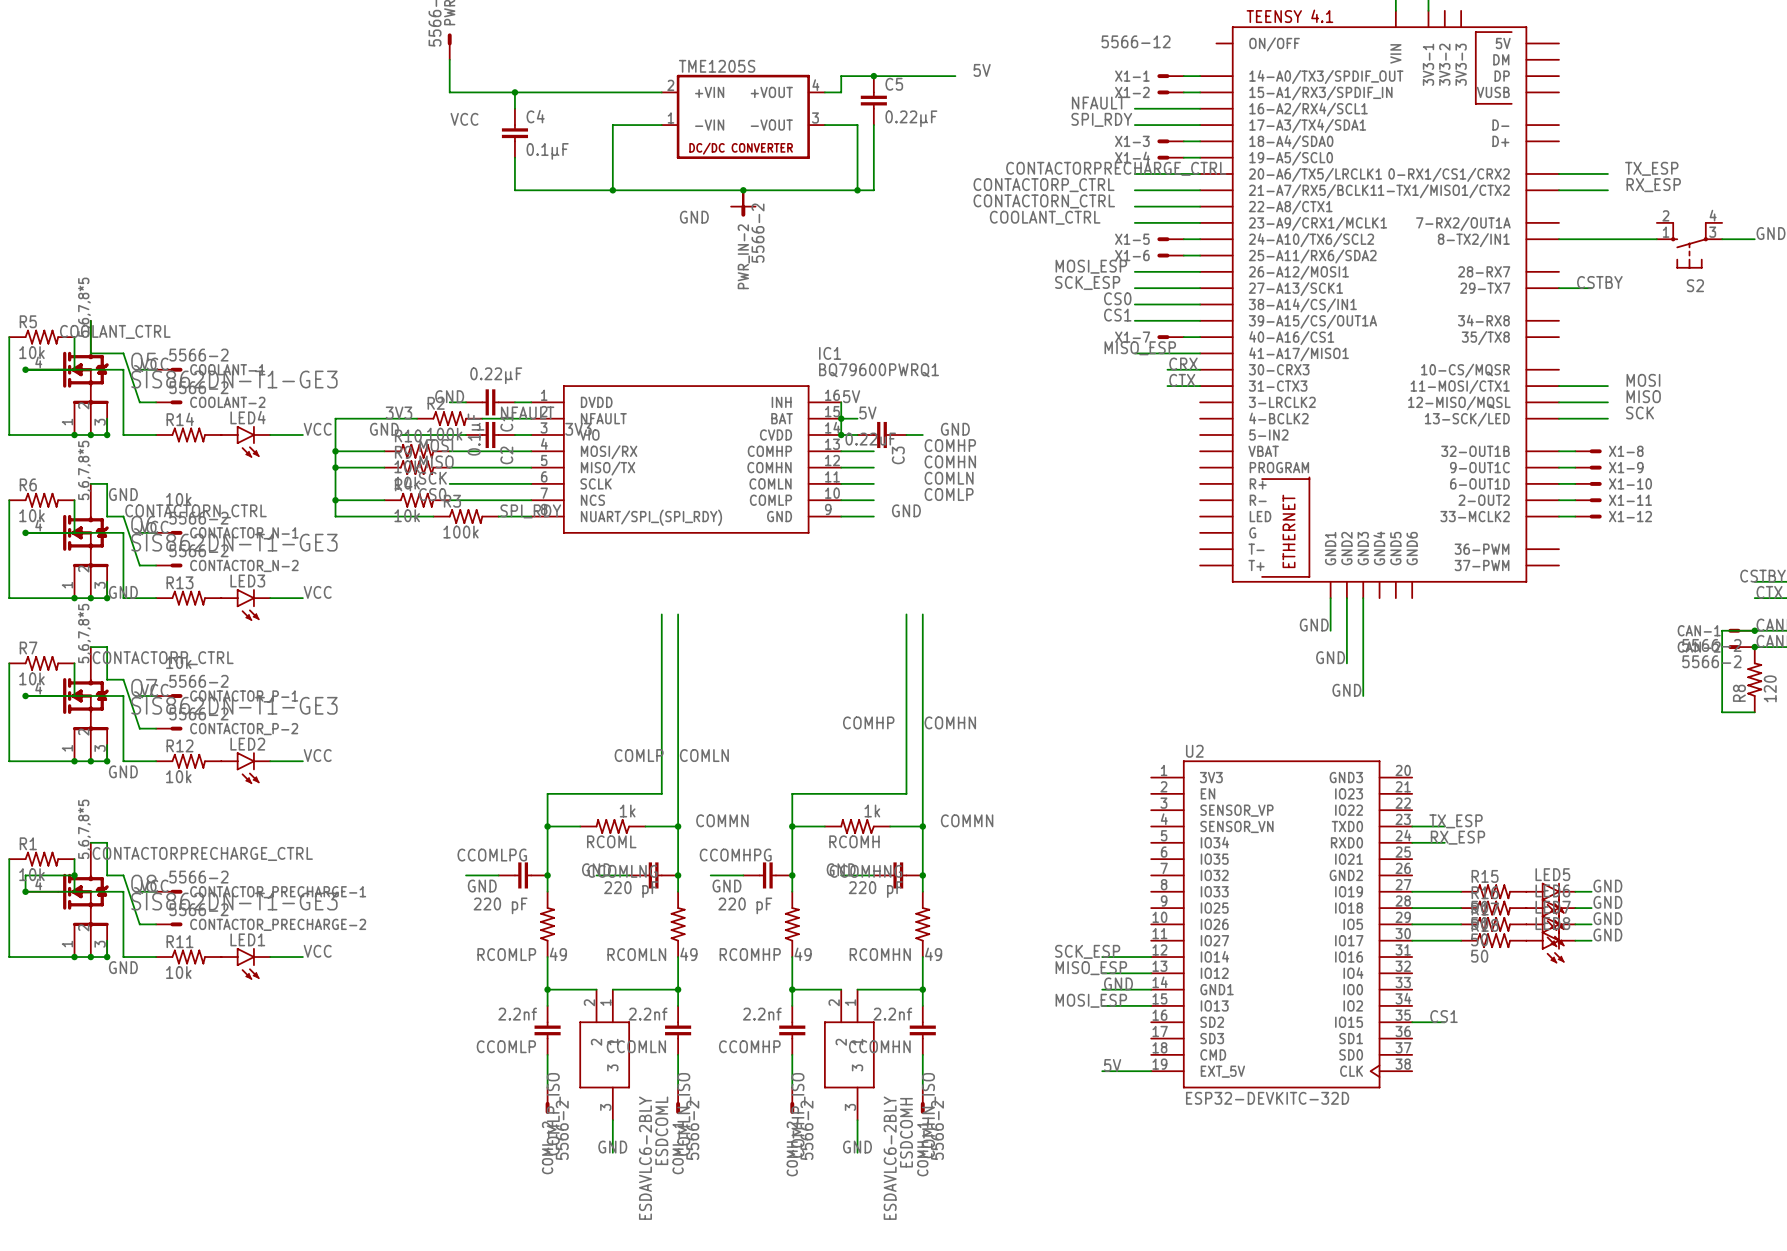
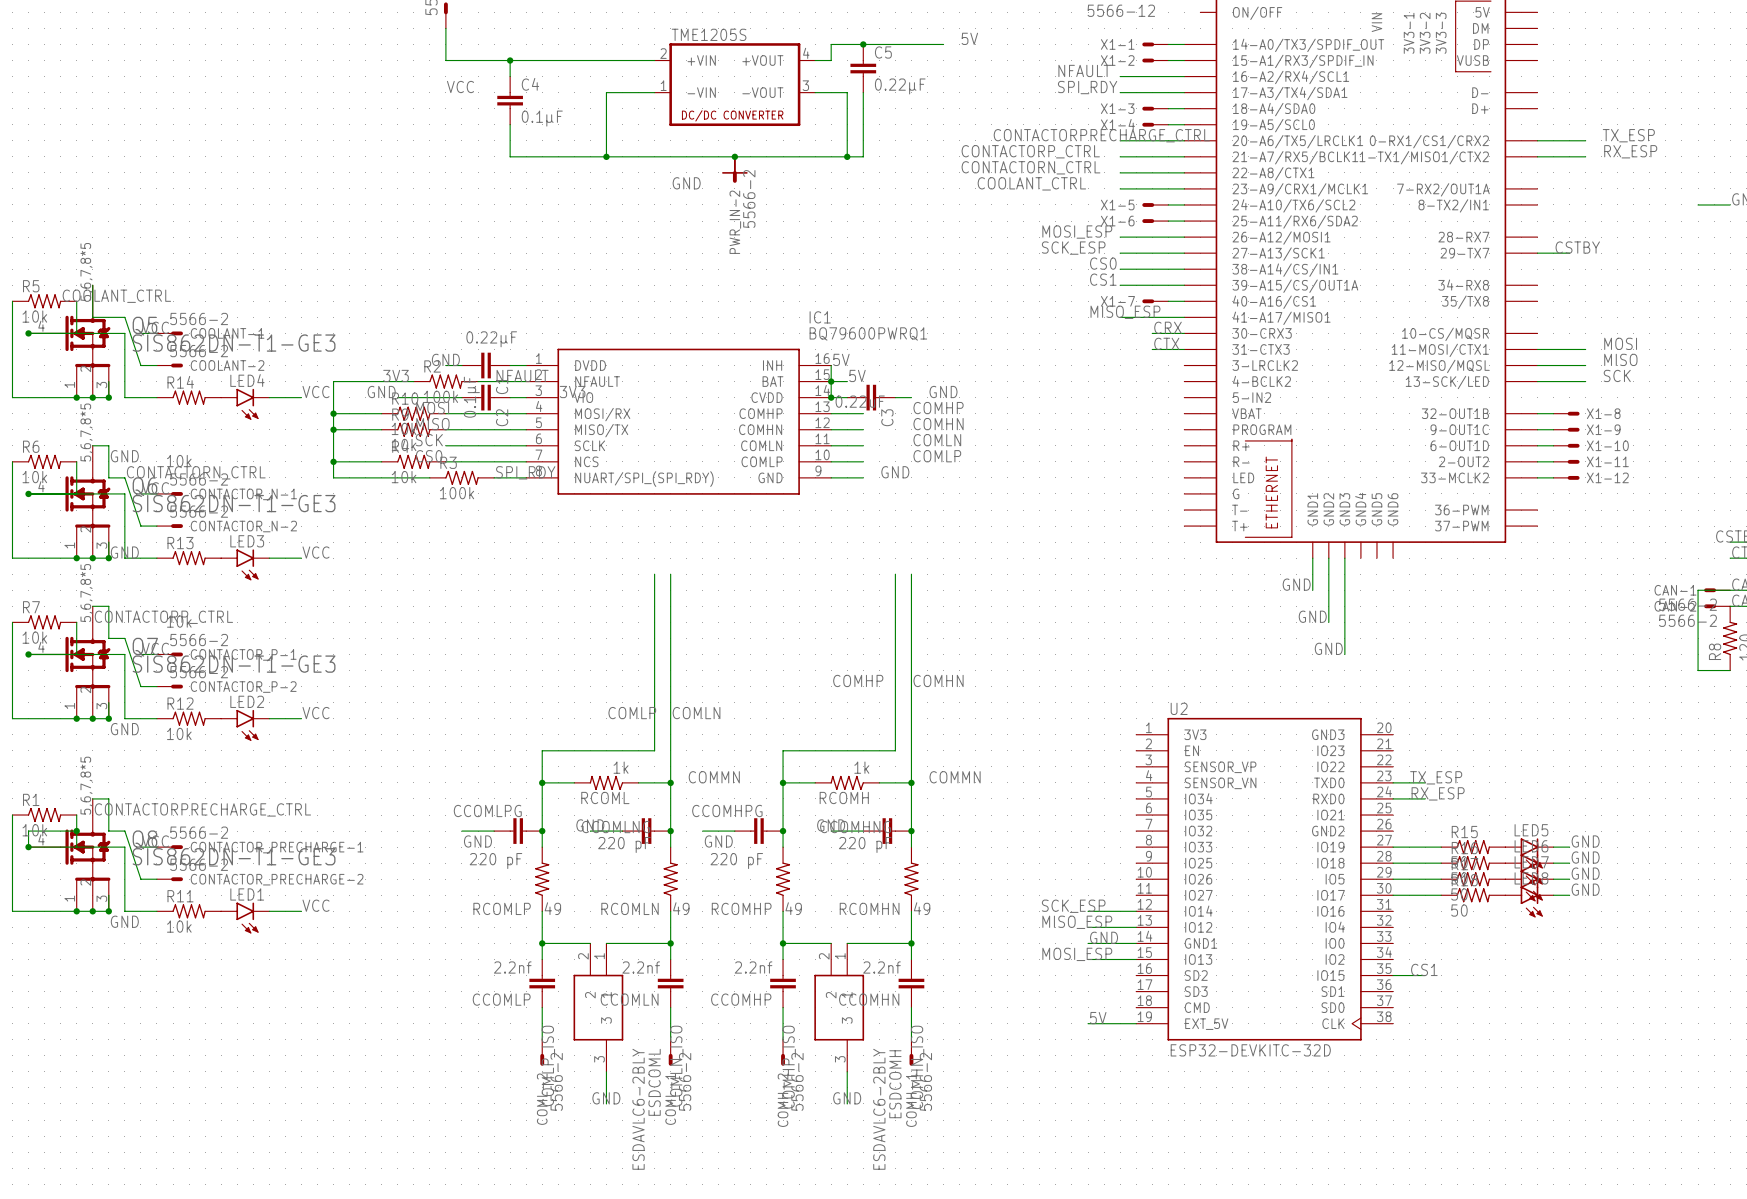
wire: (1558, 239) (1656, 239) -> none
S2: (1689, 245) -> none
junction: (1754, 630) -> none
junction: (1754, 647) -> none

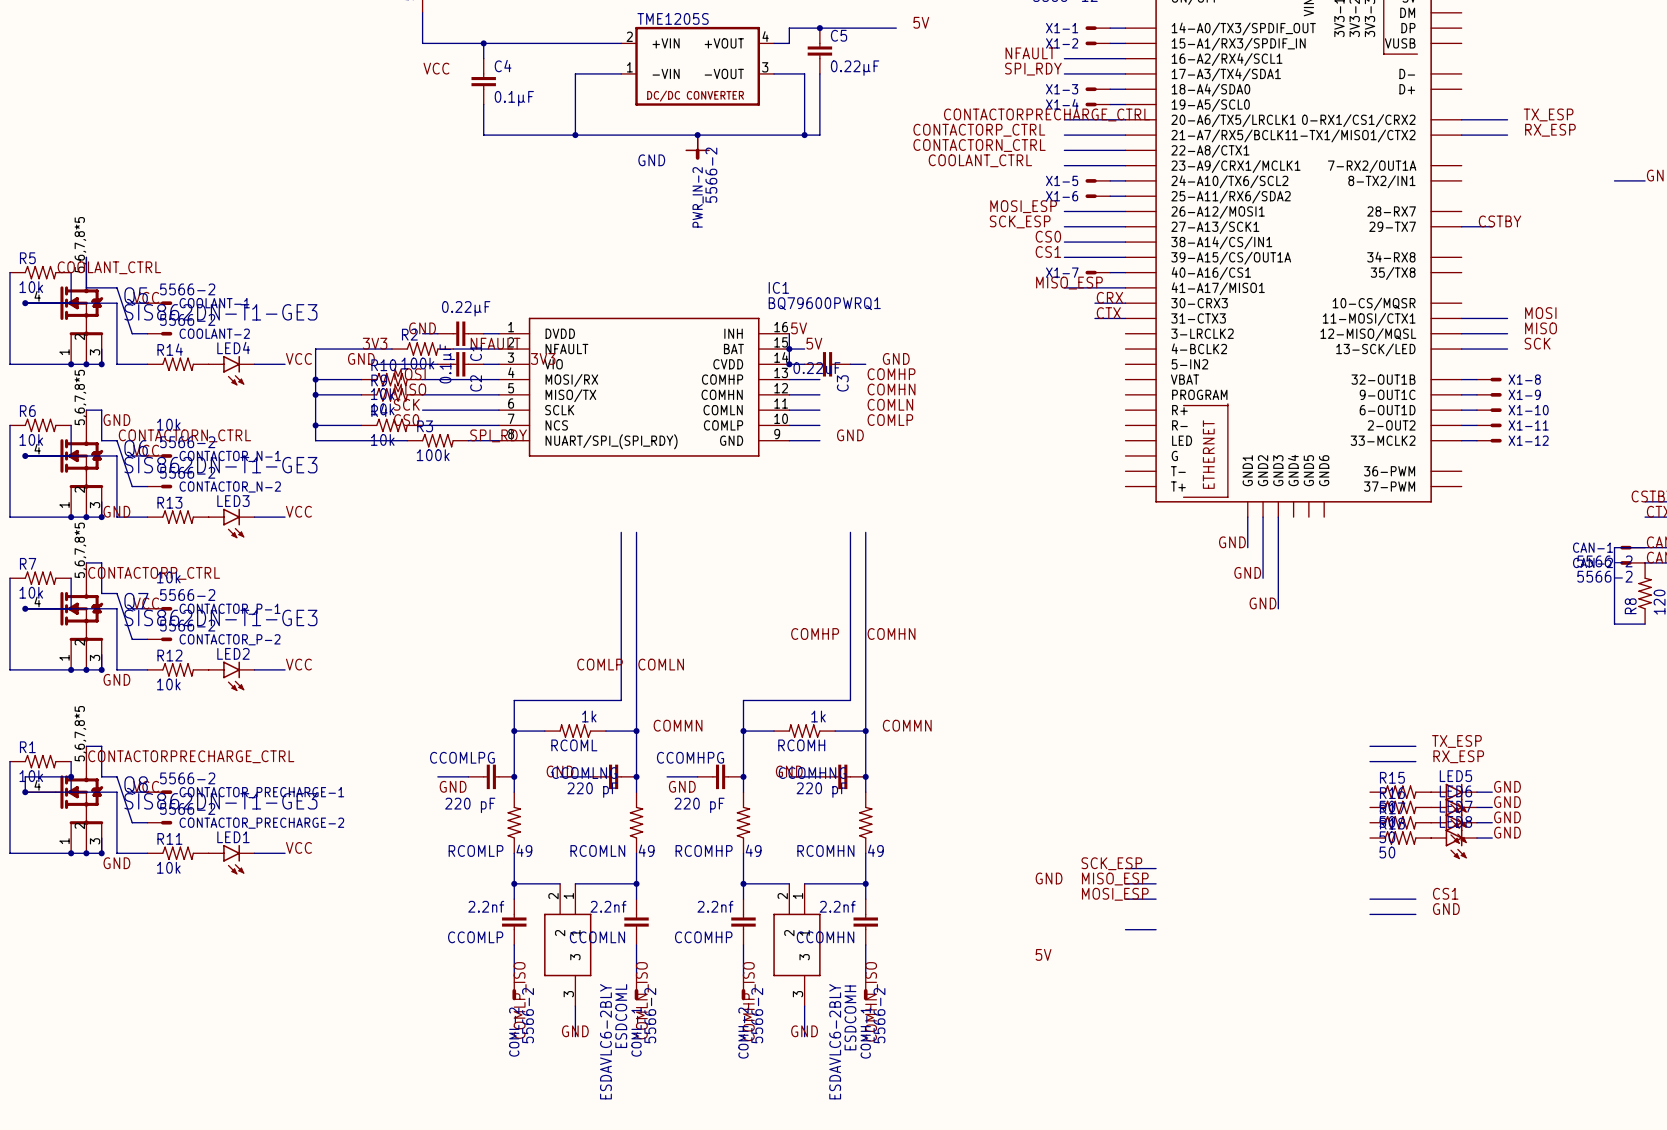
label position: TX_ESP (1436, 777) -> TX_ESP (1456, 741)
wire: (1393, 782) (1425, 782) -> none
label position: RX_ESP (1438, 793) -> RX_ESP (1458, 756)
wire: (1393, 798) (1425, 798) -> none
wire: (1393, 847) (1441, 847) -> (1370, 746) (1415, 746)
wire: (1393, 863) (1441, 863) -> (1370, 761) (1415, 761)
U2: ESP32-DEVKITC-32D (1264, 879) -> none
wire: (1393, 879) (1441, 879) -> (1370, 899) (1415, 899)
wire: (1393, 895) (1441, 895) -> (1370, 914) (1415, 914)
label position: SCK_ESP (1073, 906) -> SCK_ESP (1111, 863)
wire: (1088, 911) (1136, 911) -> none
label position: MISO_ESP (1077, 922) -> MISO_ESP (1115, 879)
wire: (1088, 927) (1136, 927) -> none
wire: none -> (1125, 868) (1156, 868)
wire: (1088, 943) (1136, 943) -> none
wire: none -> (1125, 883) (1156, 883)
label position: MOSI_ESP (1077, 954) -> MOSI_ESP (1115, 894)
wire: (1088, 959) (1136, 959) -> none
wire: none -> (1125, 899) (1156, 899)
label position: CS1 (1424, 969) -> CS1 (1445, 893)
label: none -> GND (1446, 909)
wire: (1393, 975) (1425, 975) -> none
wire: none -> (1125, 929) (1156, 929)
wire: (1088, 1023) (1136, 1023) -> none

